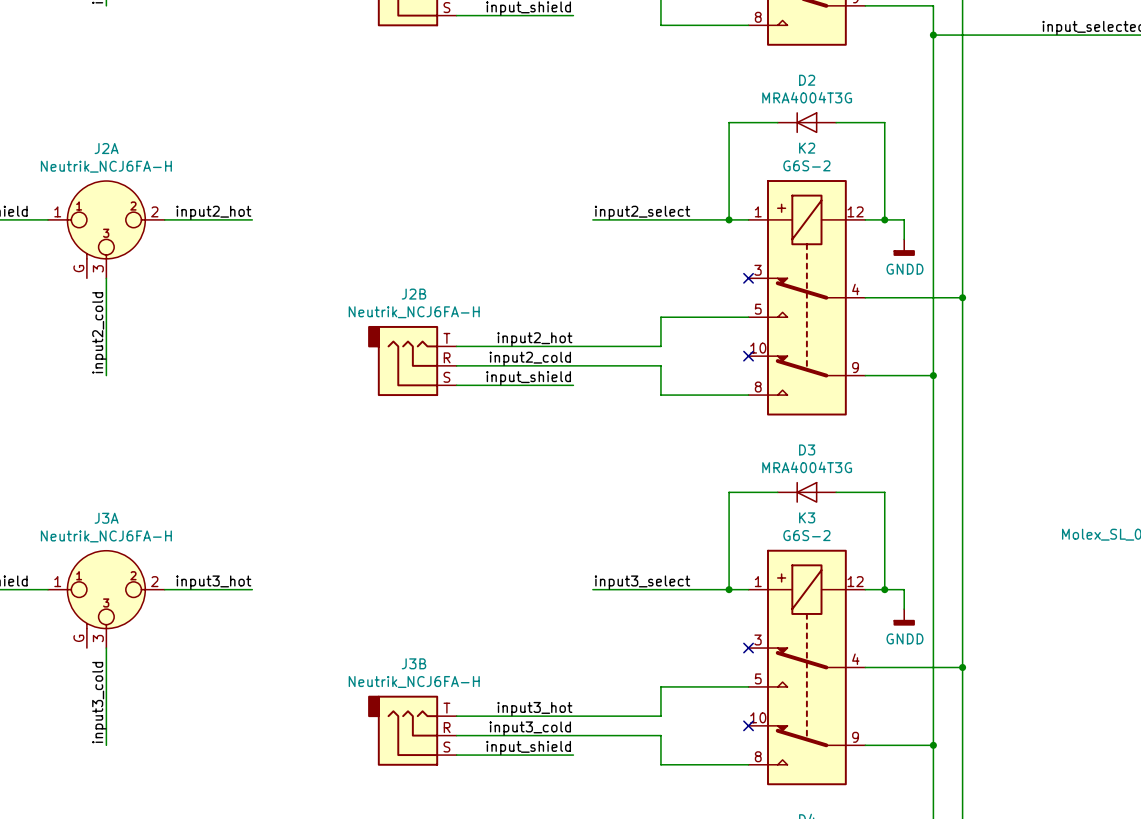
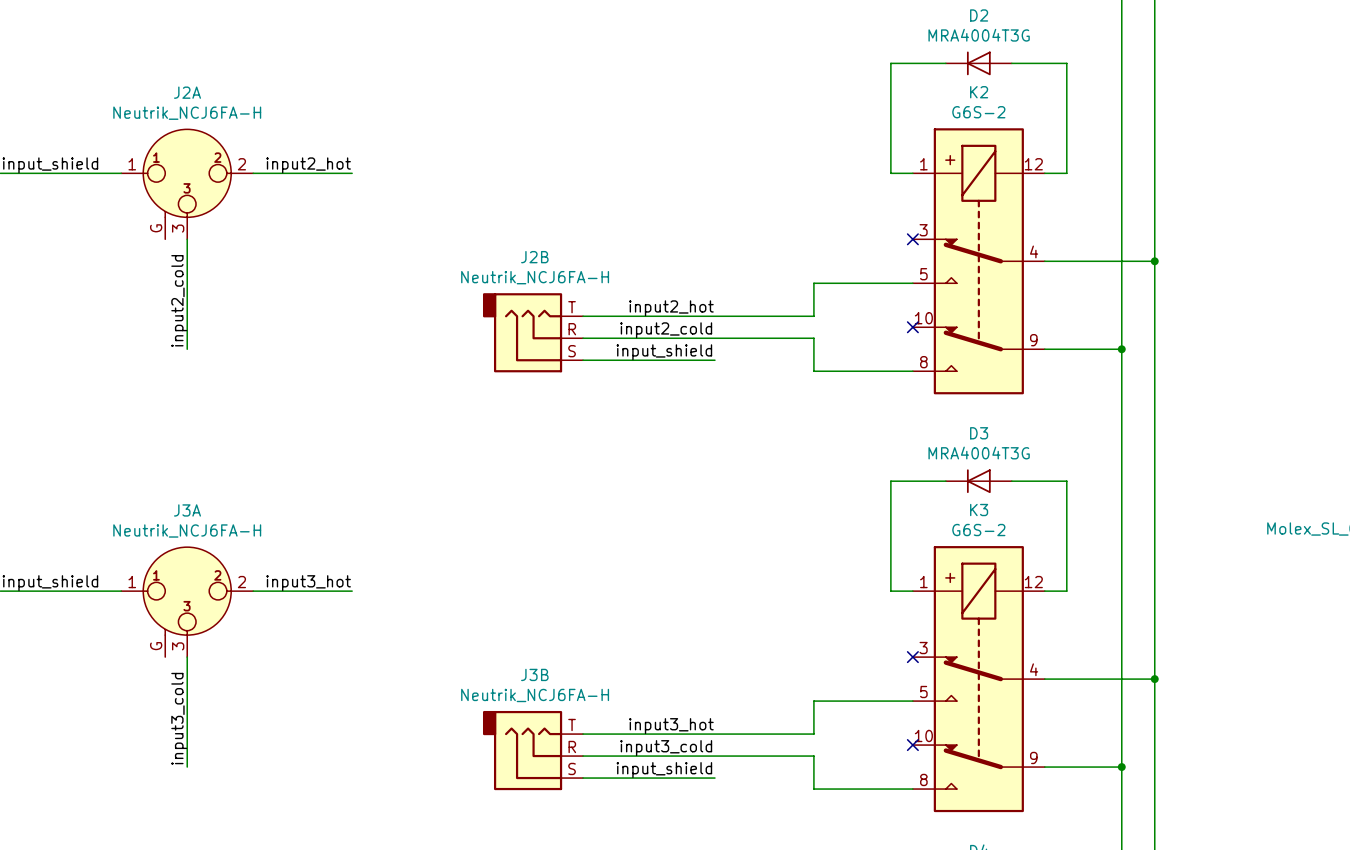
label: input2_select (642, 212) -> none
wire: (592, 219) (729, 219) -> none
junction: (729, 219) -> none
wire: (884, 219) (904, 219) (904, 239) -> none
junction: (884, 219) -> none
power symbol: GNDD (904, 247) -> none
label: input3_select (642, 582) -> none
wire: (592, 589) (729, 589) -> none
junction: (729, 589) -> none
wire: (884, 589) (904, 589) (904, 609) -> none
junction: (884, 589) -> none
power symbol: GNDD (904, 617) -> none

